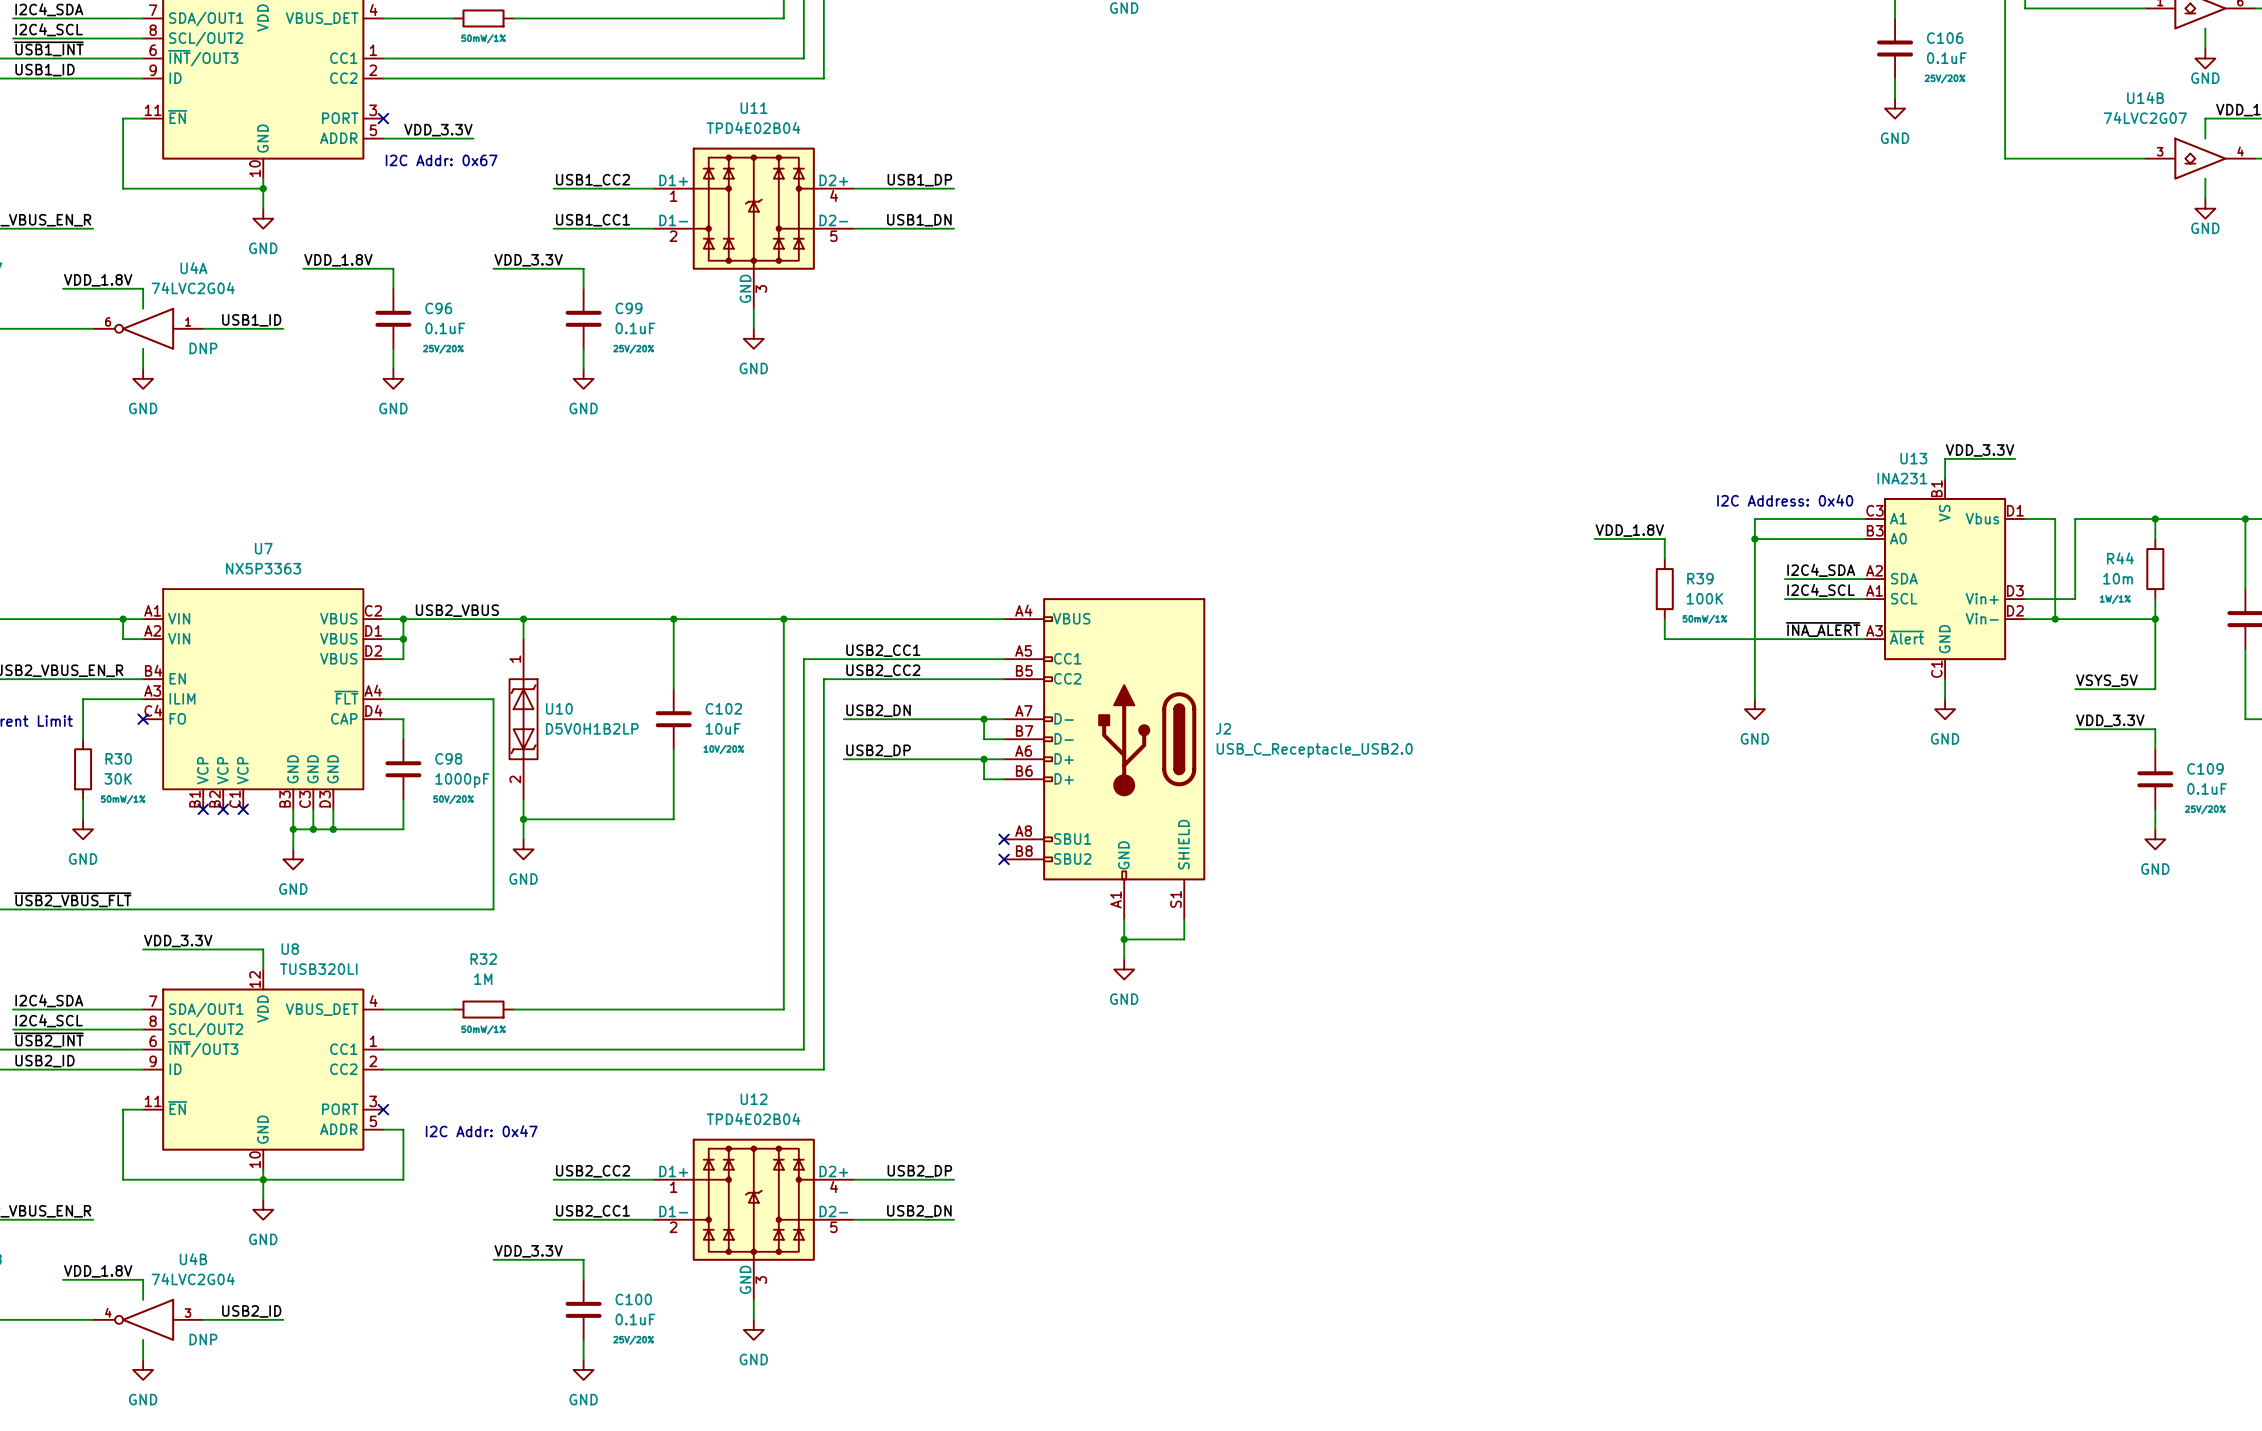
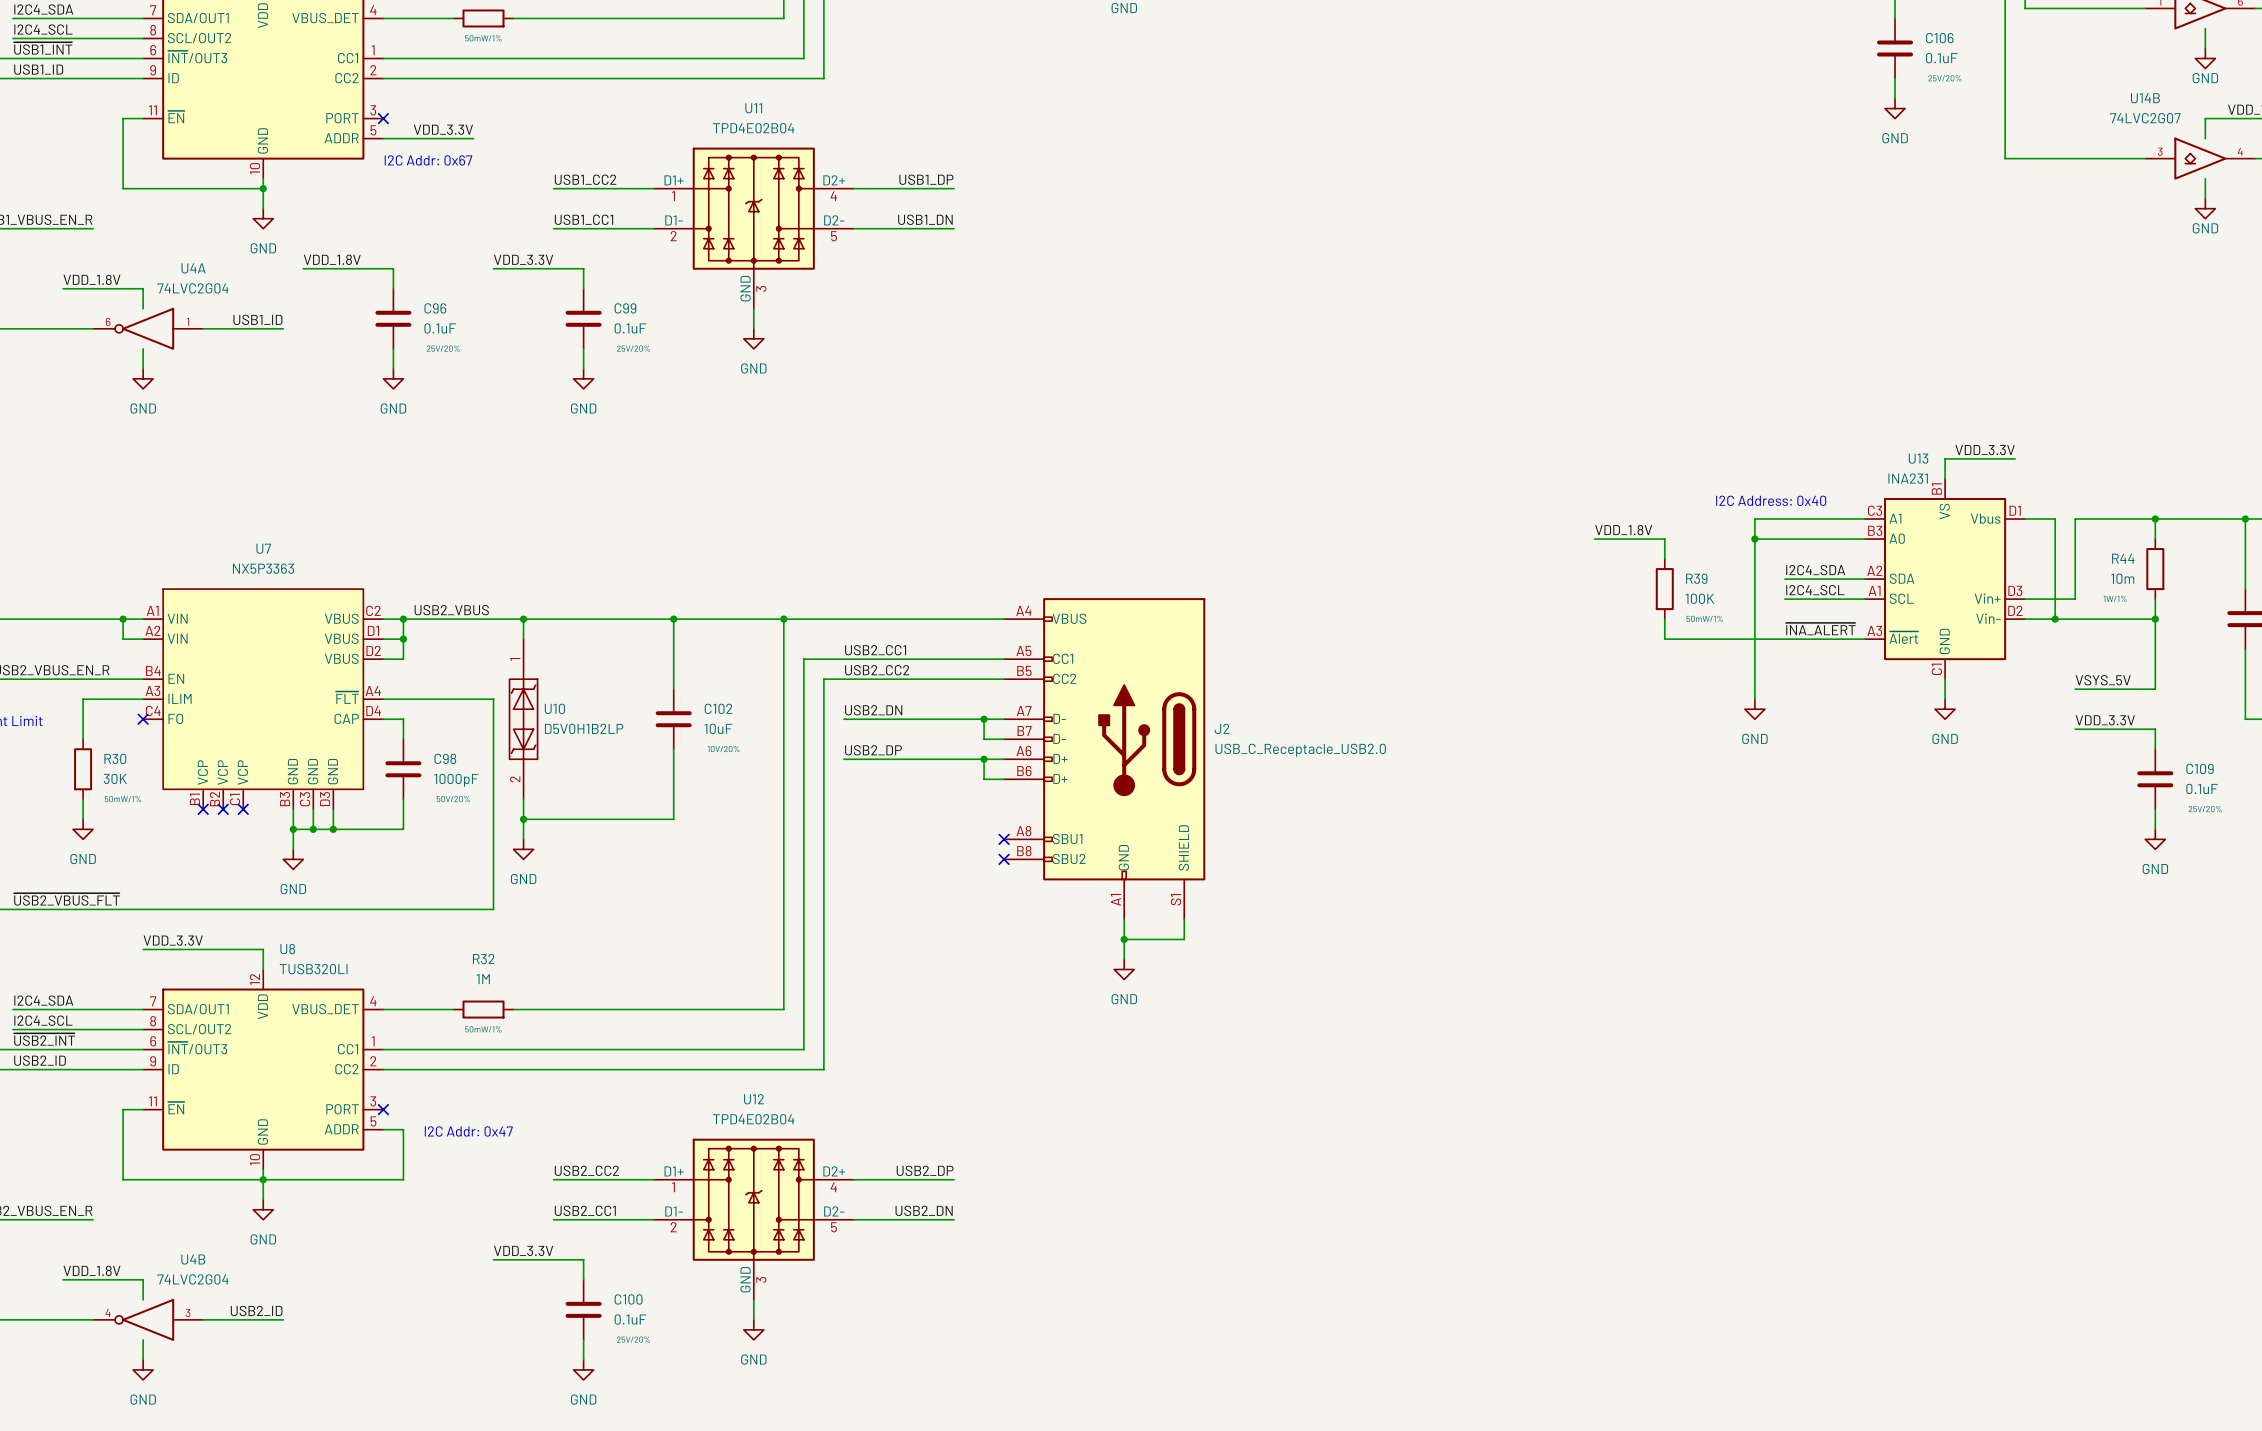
U4A text: DNP (203, 348) -> none
U4B text: DNP (203, 1339) -> none

